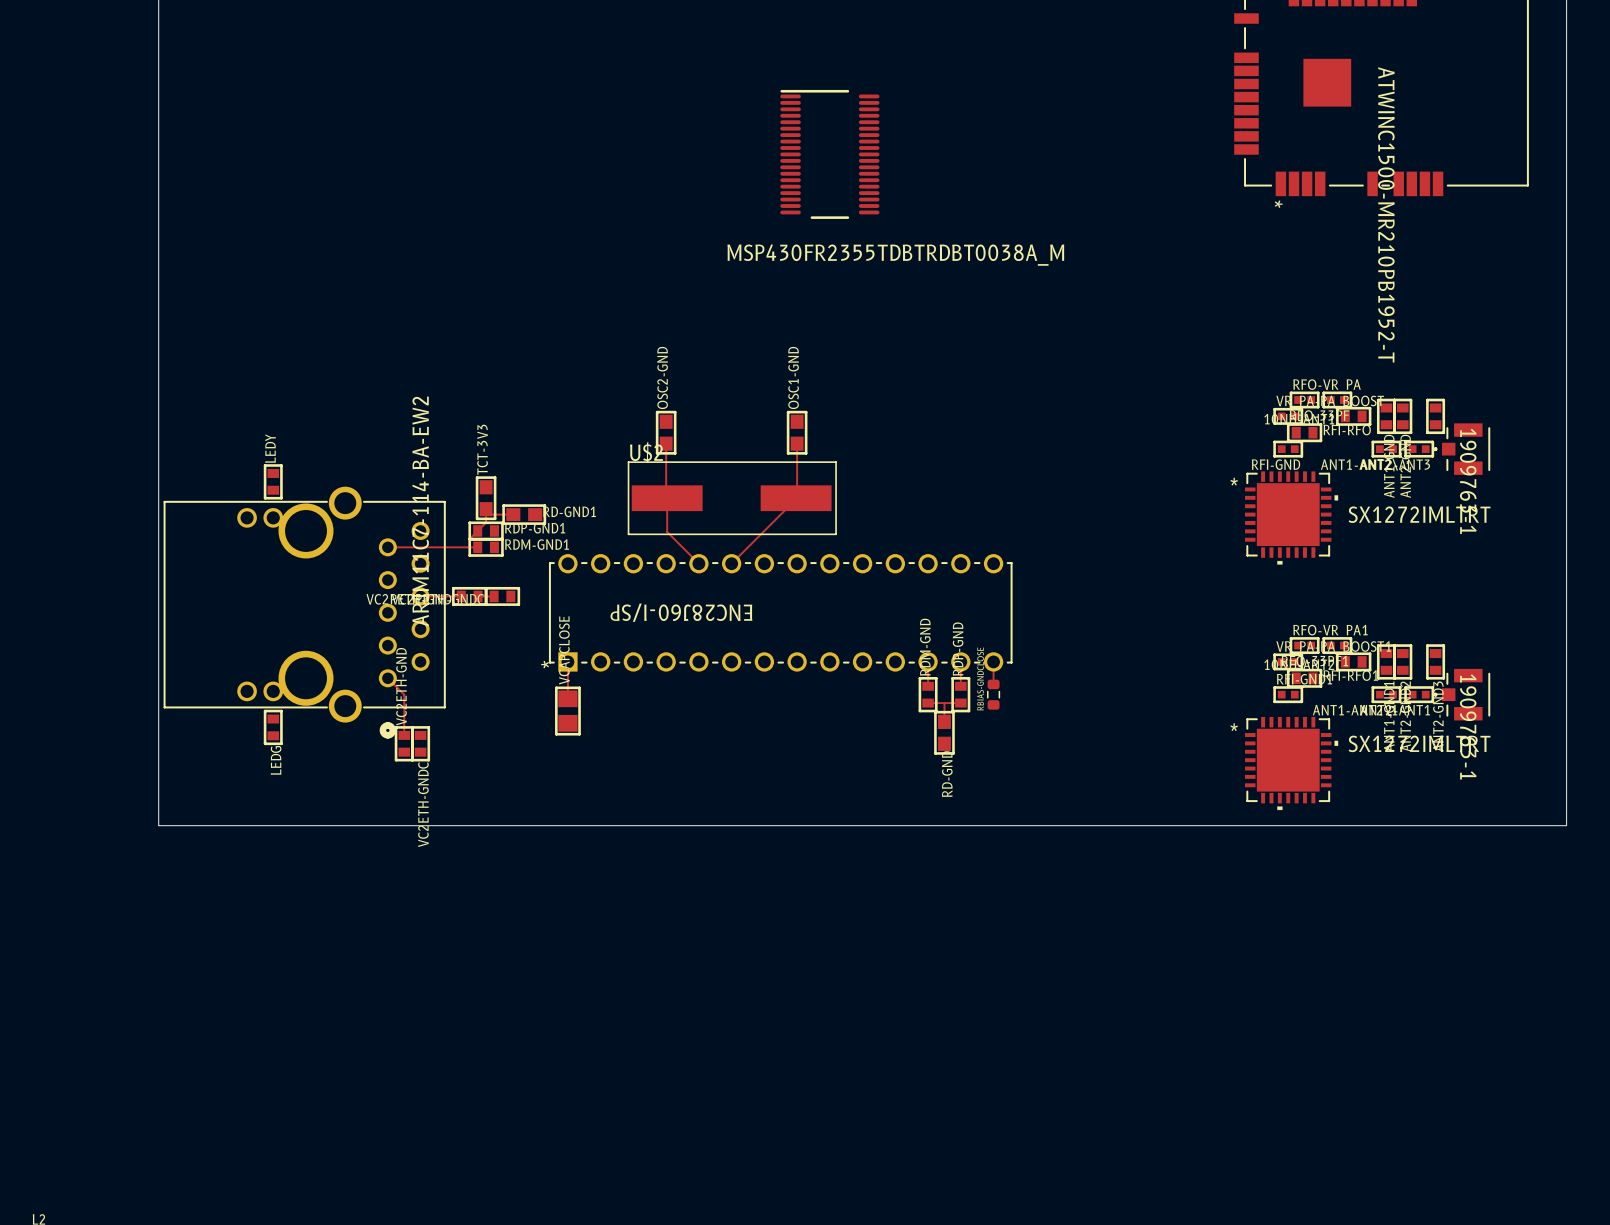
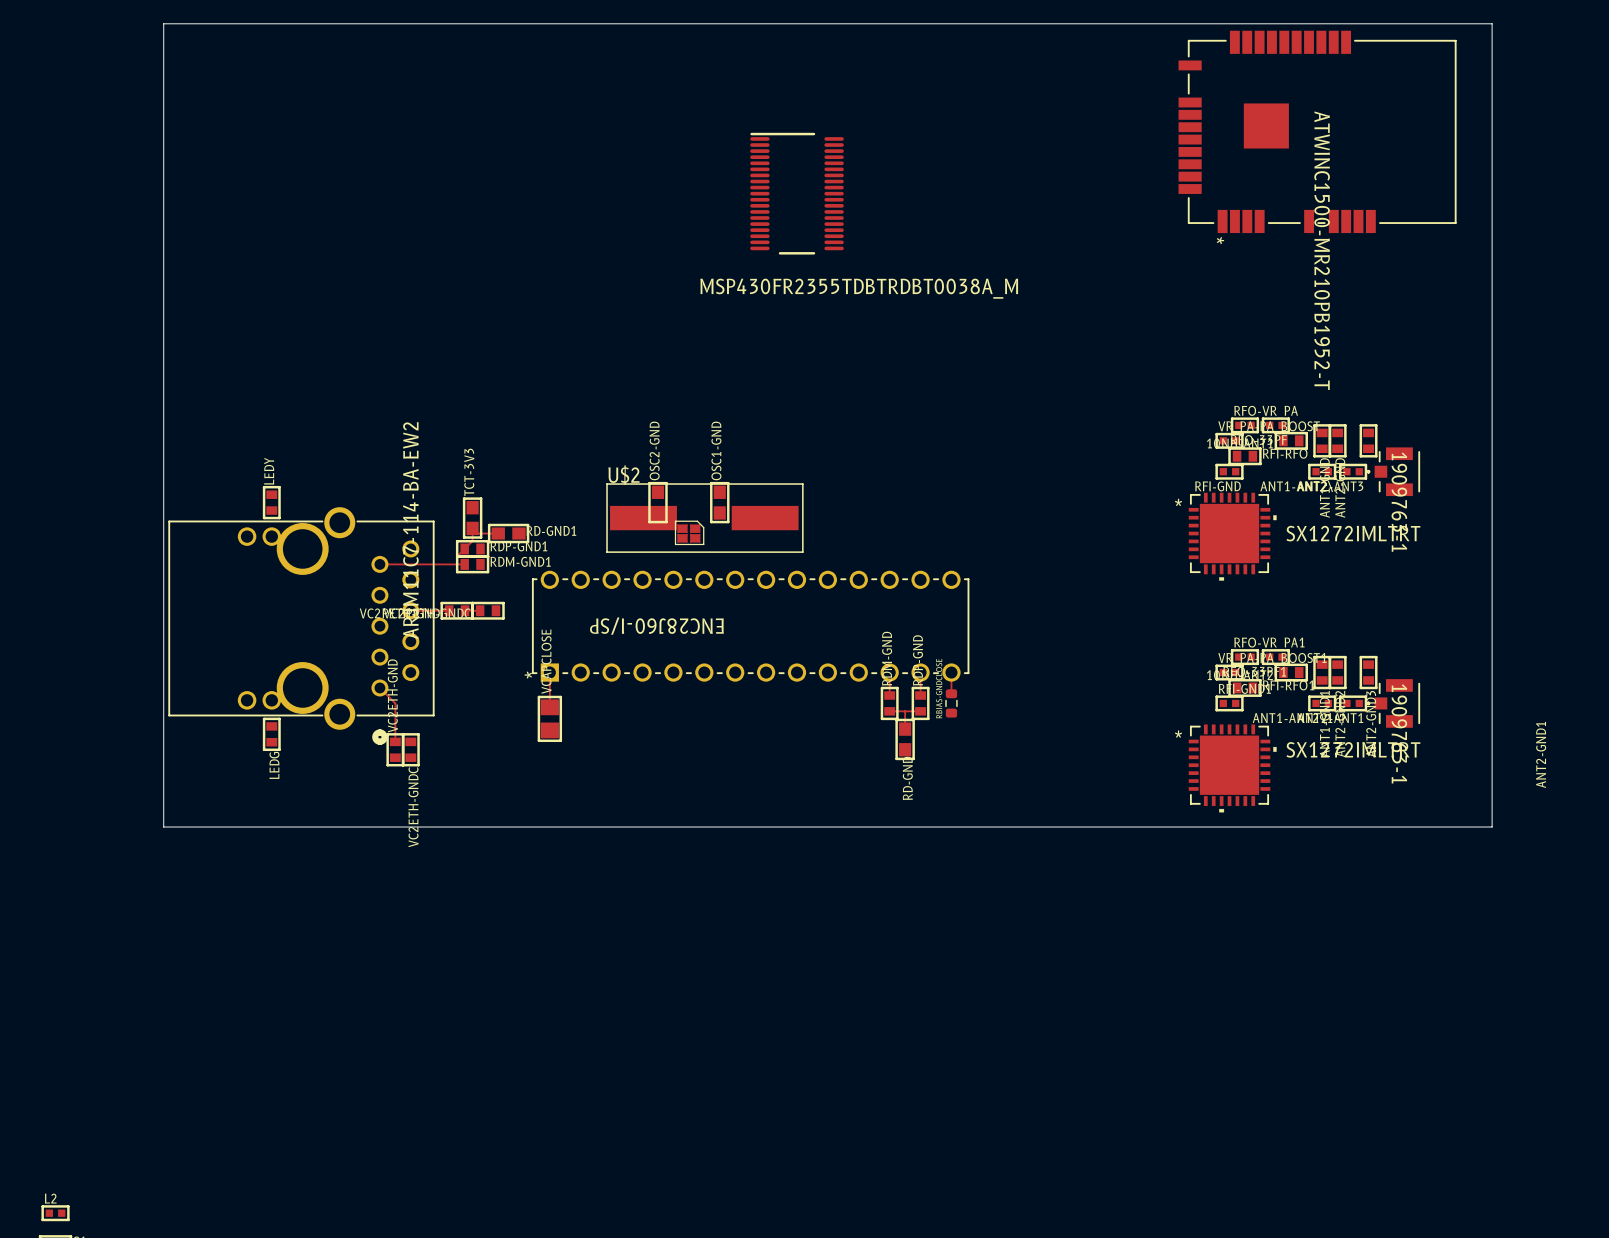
OSC2-GND position: (666, 432) -> (657, 502)
OSC1-GND position: (797, 432) -> (719, 502)
track: (666, 443) (667, 532) (698, 563) -> none
track: (797, 443) (796, 499) (731, 563) -> none
part: none -> (689, 532)

